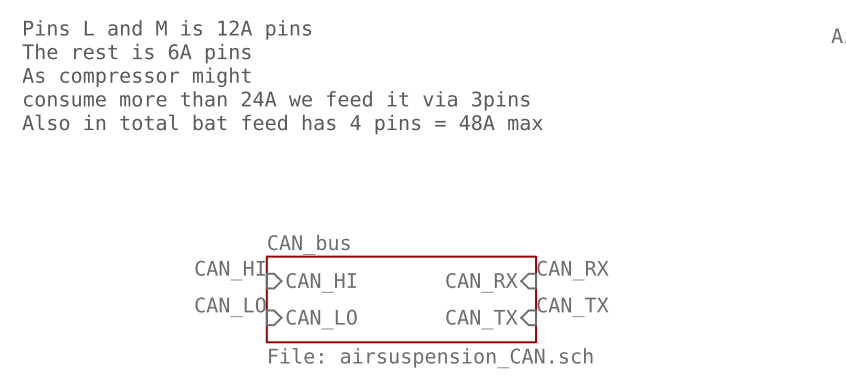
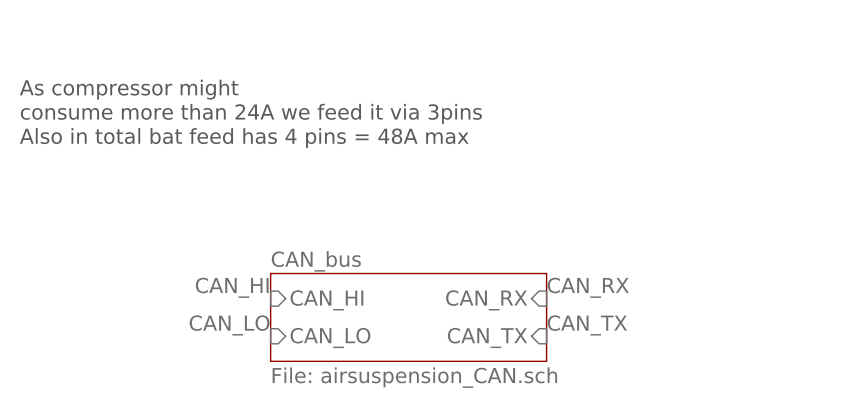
text: Pins L and M is 12A pins (167, 29) -> none
text: The rest is 6A pins (136, 53) -> none

